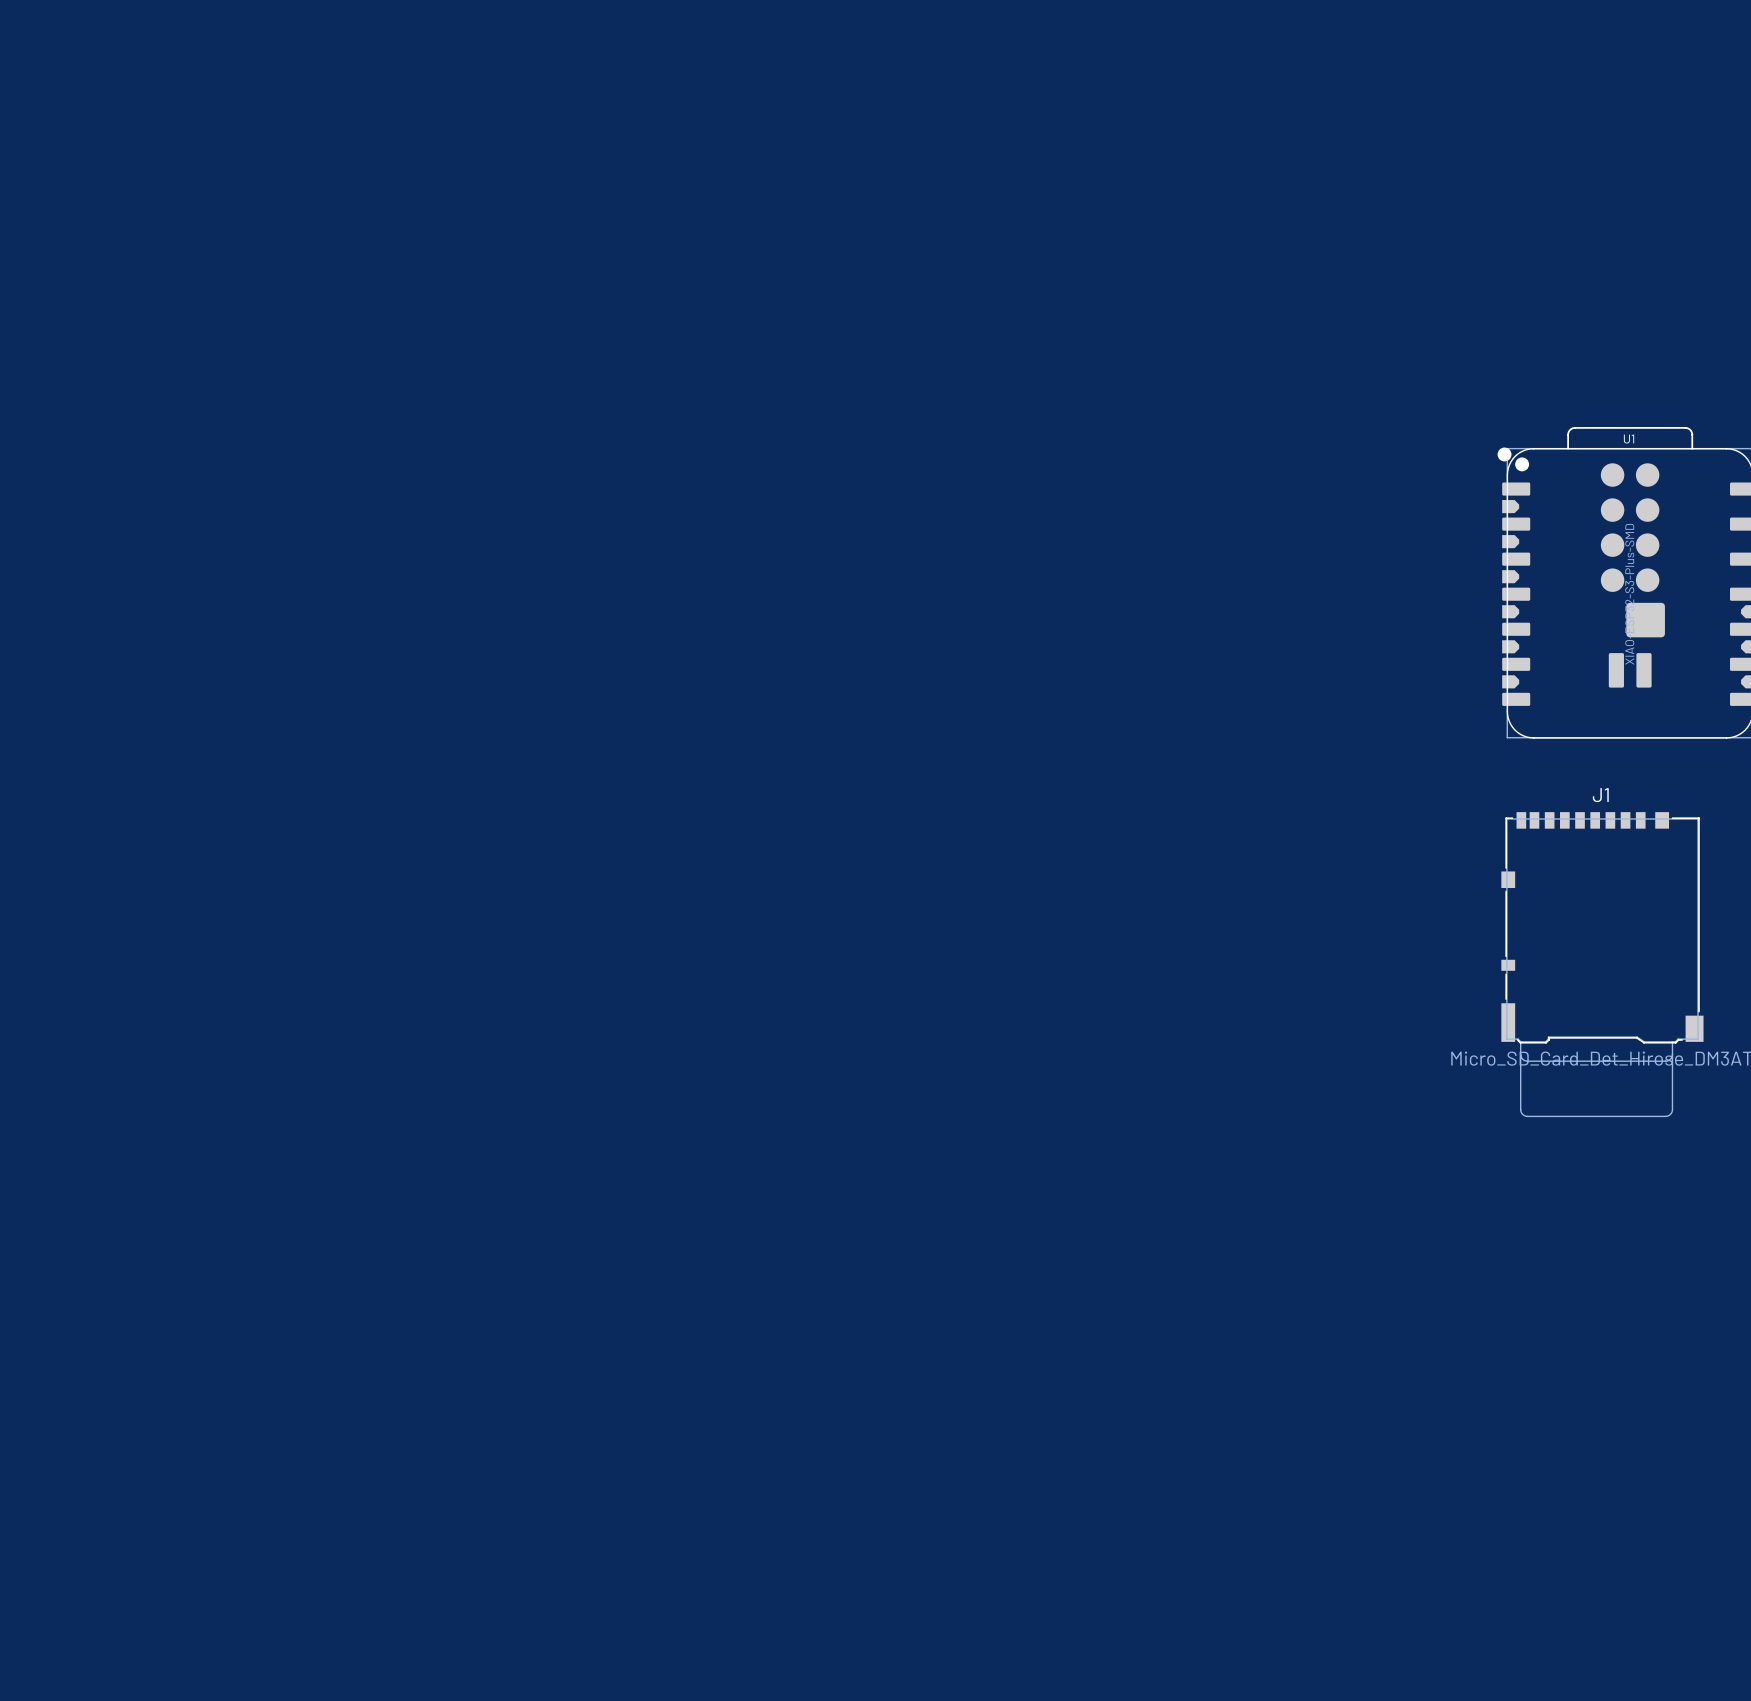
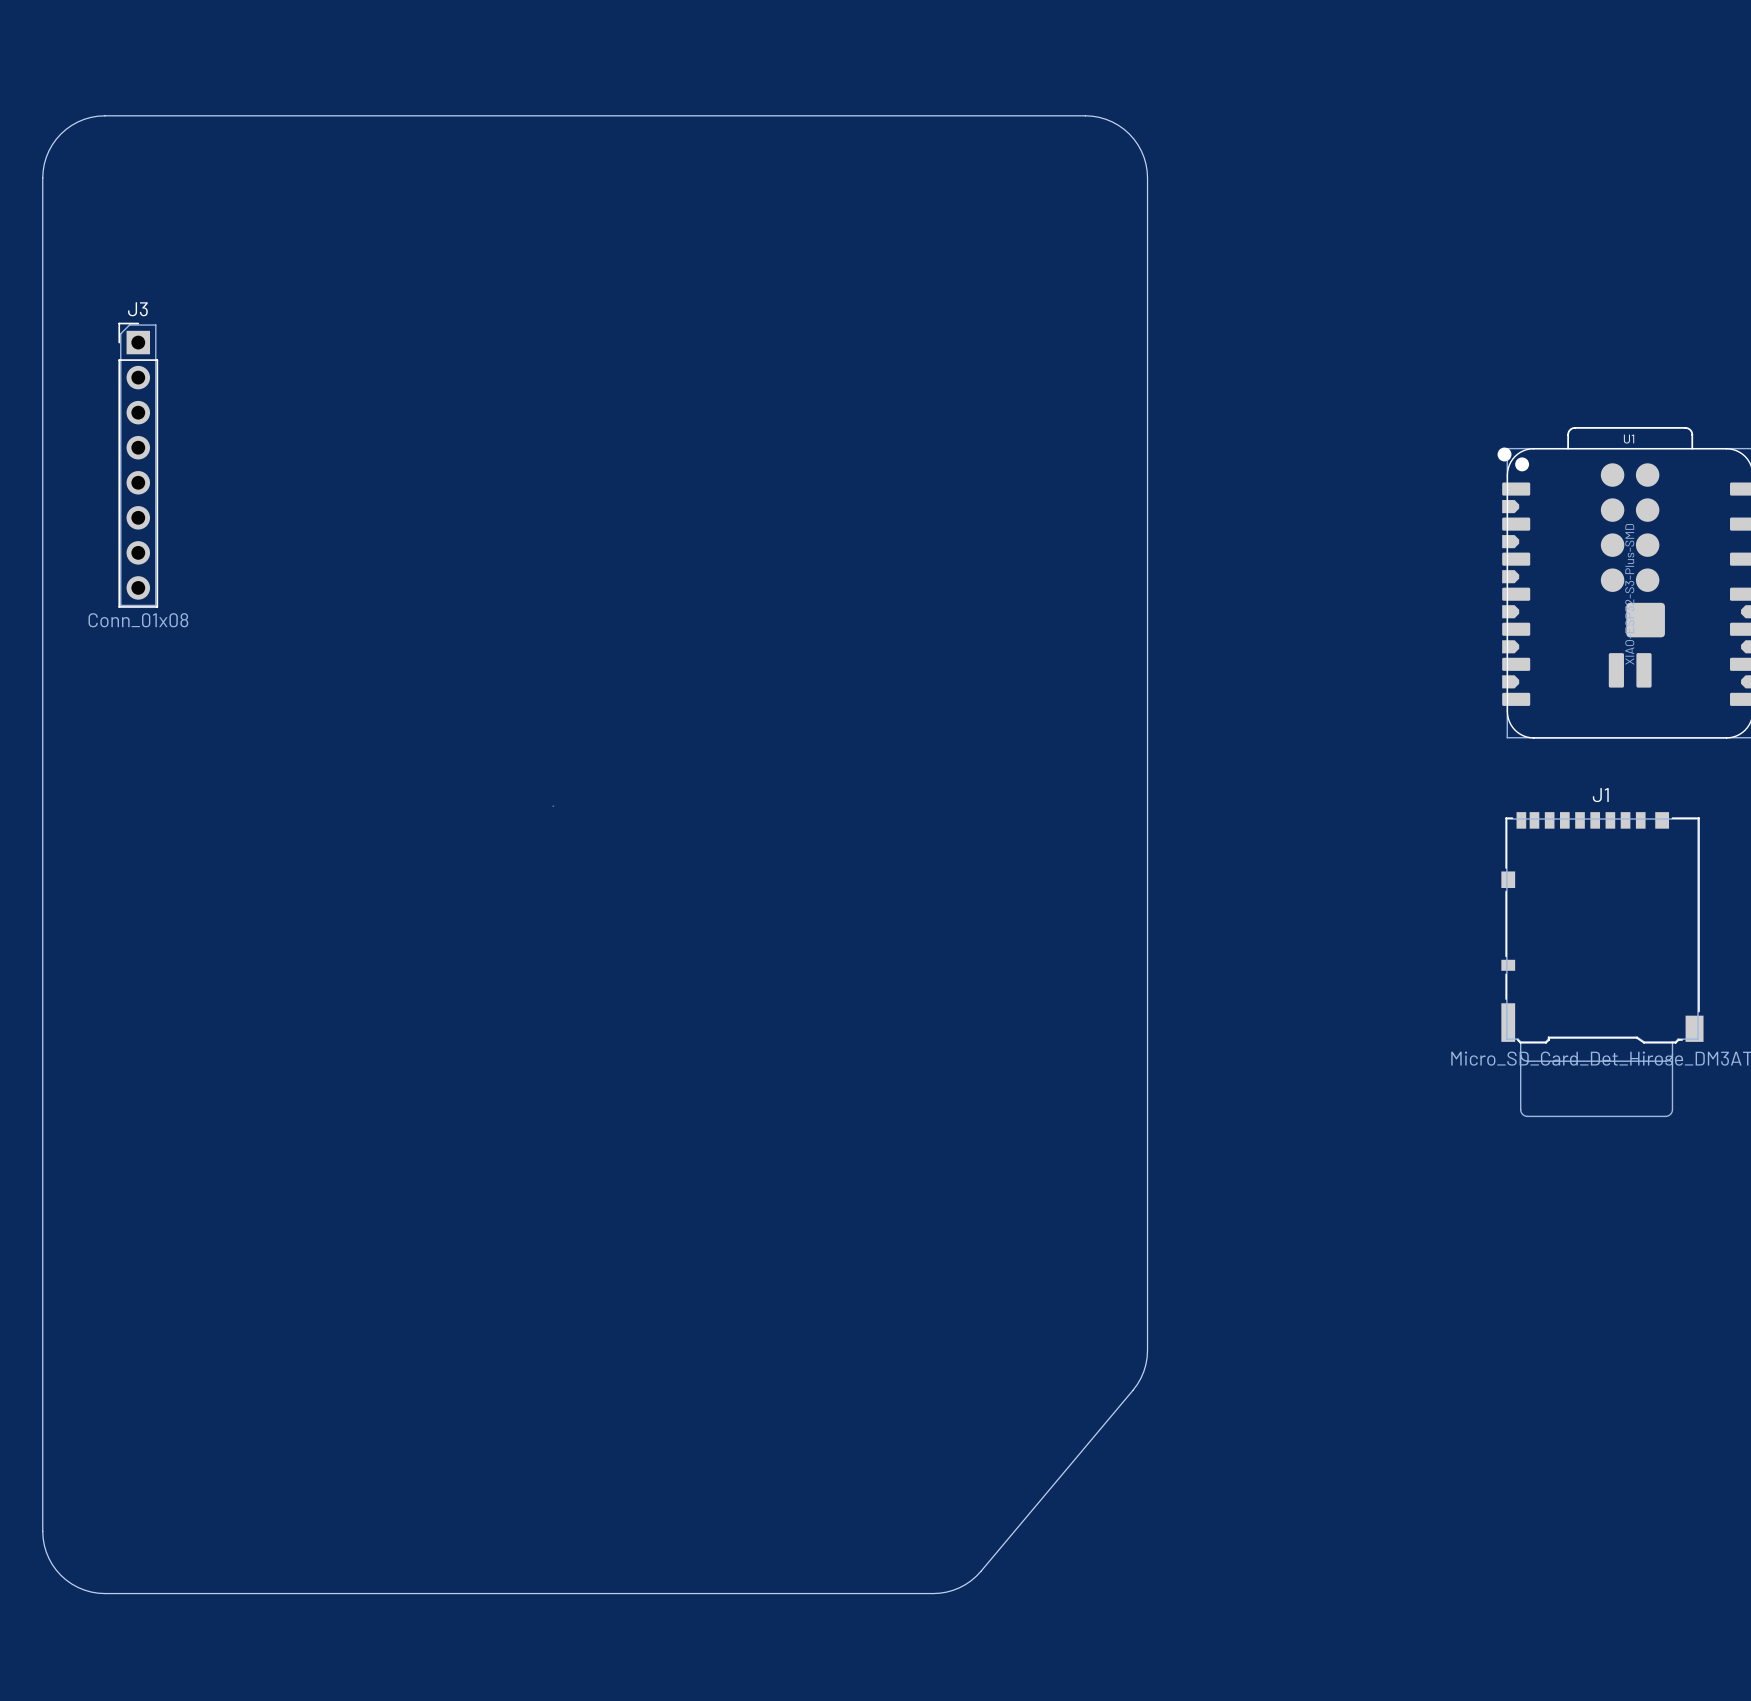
board edge: none -> (104, 115) (1085, 115) (1105, 119) (1118, 125) (1129, 134) (1138, 144) (1145, 164) (1147, 177) (1147, 1357) (1143, 1371) (1132, 1390) (980, 1571) (965, 1584) (953, 1590) (933, 1593) (104, 1593) (91, 1592) (77, 1587) (60, 1575) (52, 1564) (46, 1551) (42, 1531) (42, 177) (44, 164) (48, 150) (60, 134) (77, 121) (91, 117) (104, 115)
J3: none -> Conn_01x08 (138, 465)

